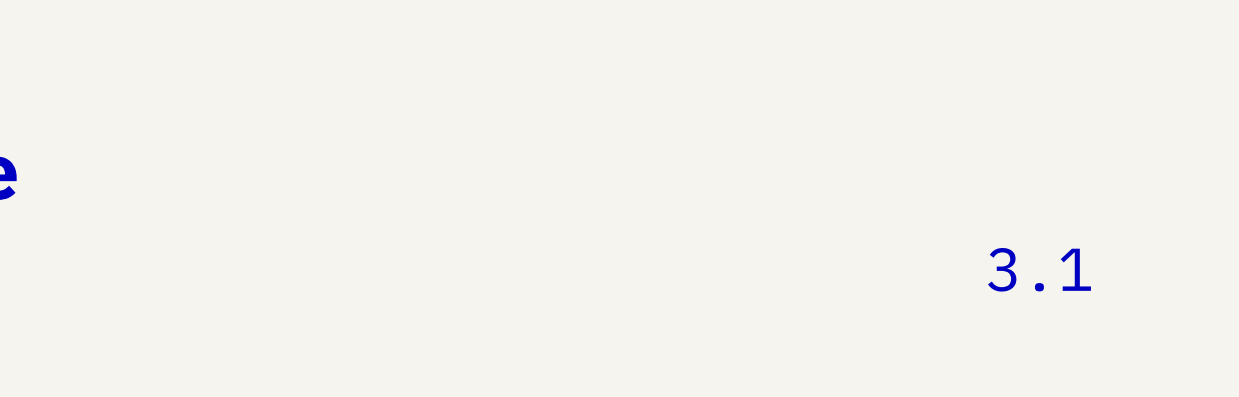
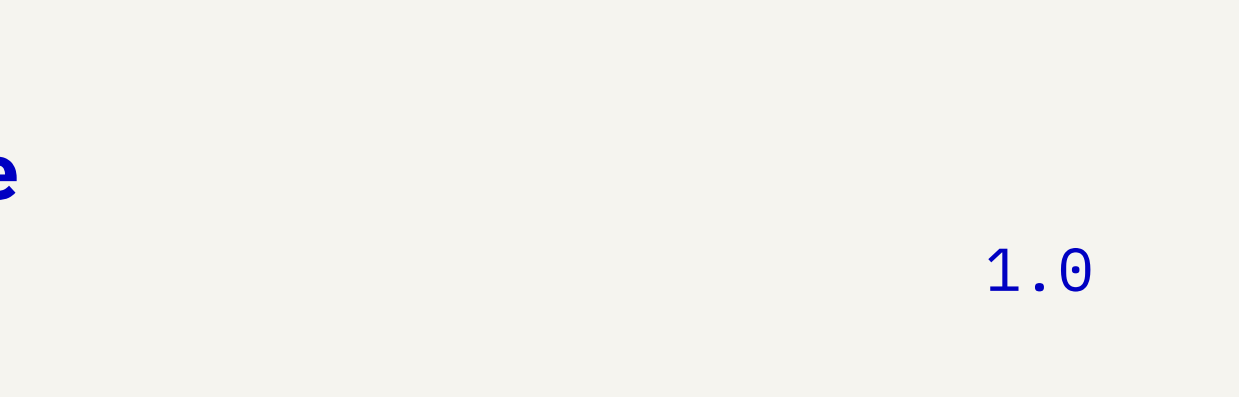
text: 3.1 (1039, 269) -> 1.0 (1039, 269)

